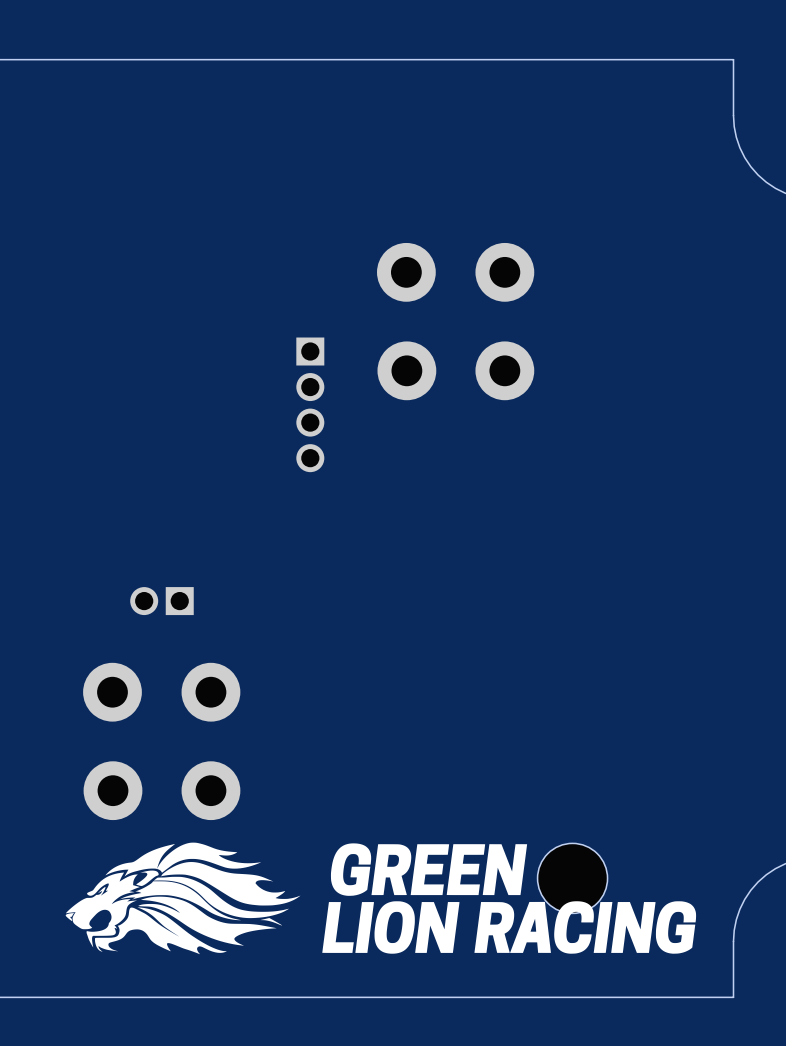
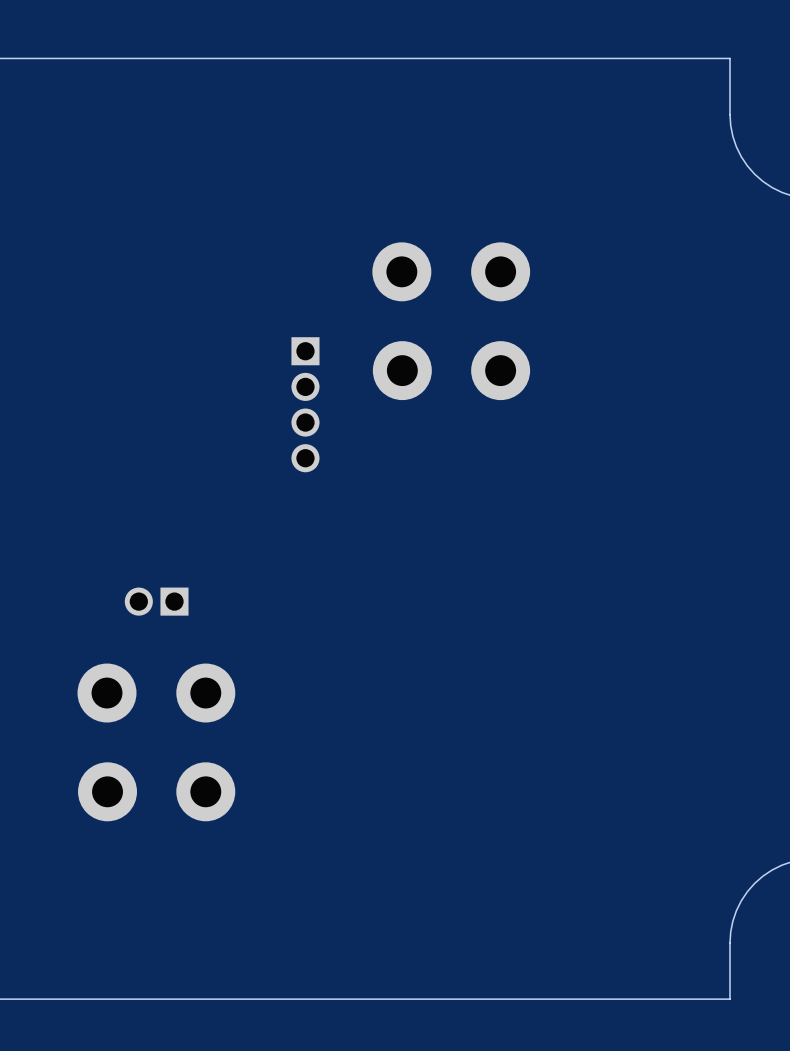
drawing: [65, 842, 697, 955] -> none
part: (572, 878) -> none

